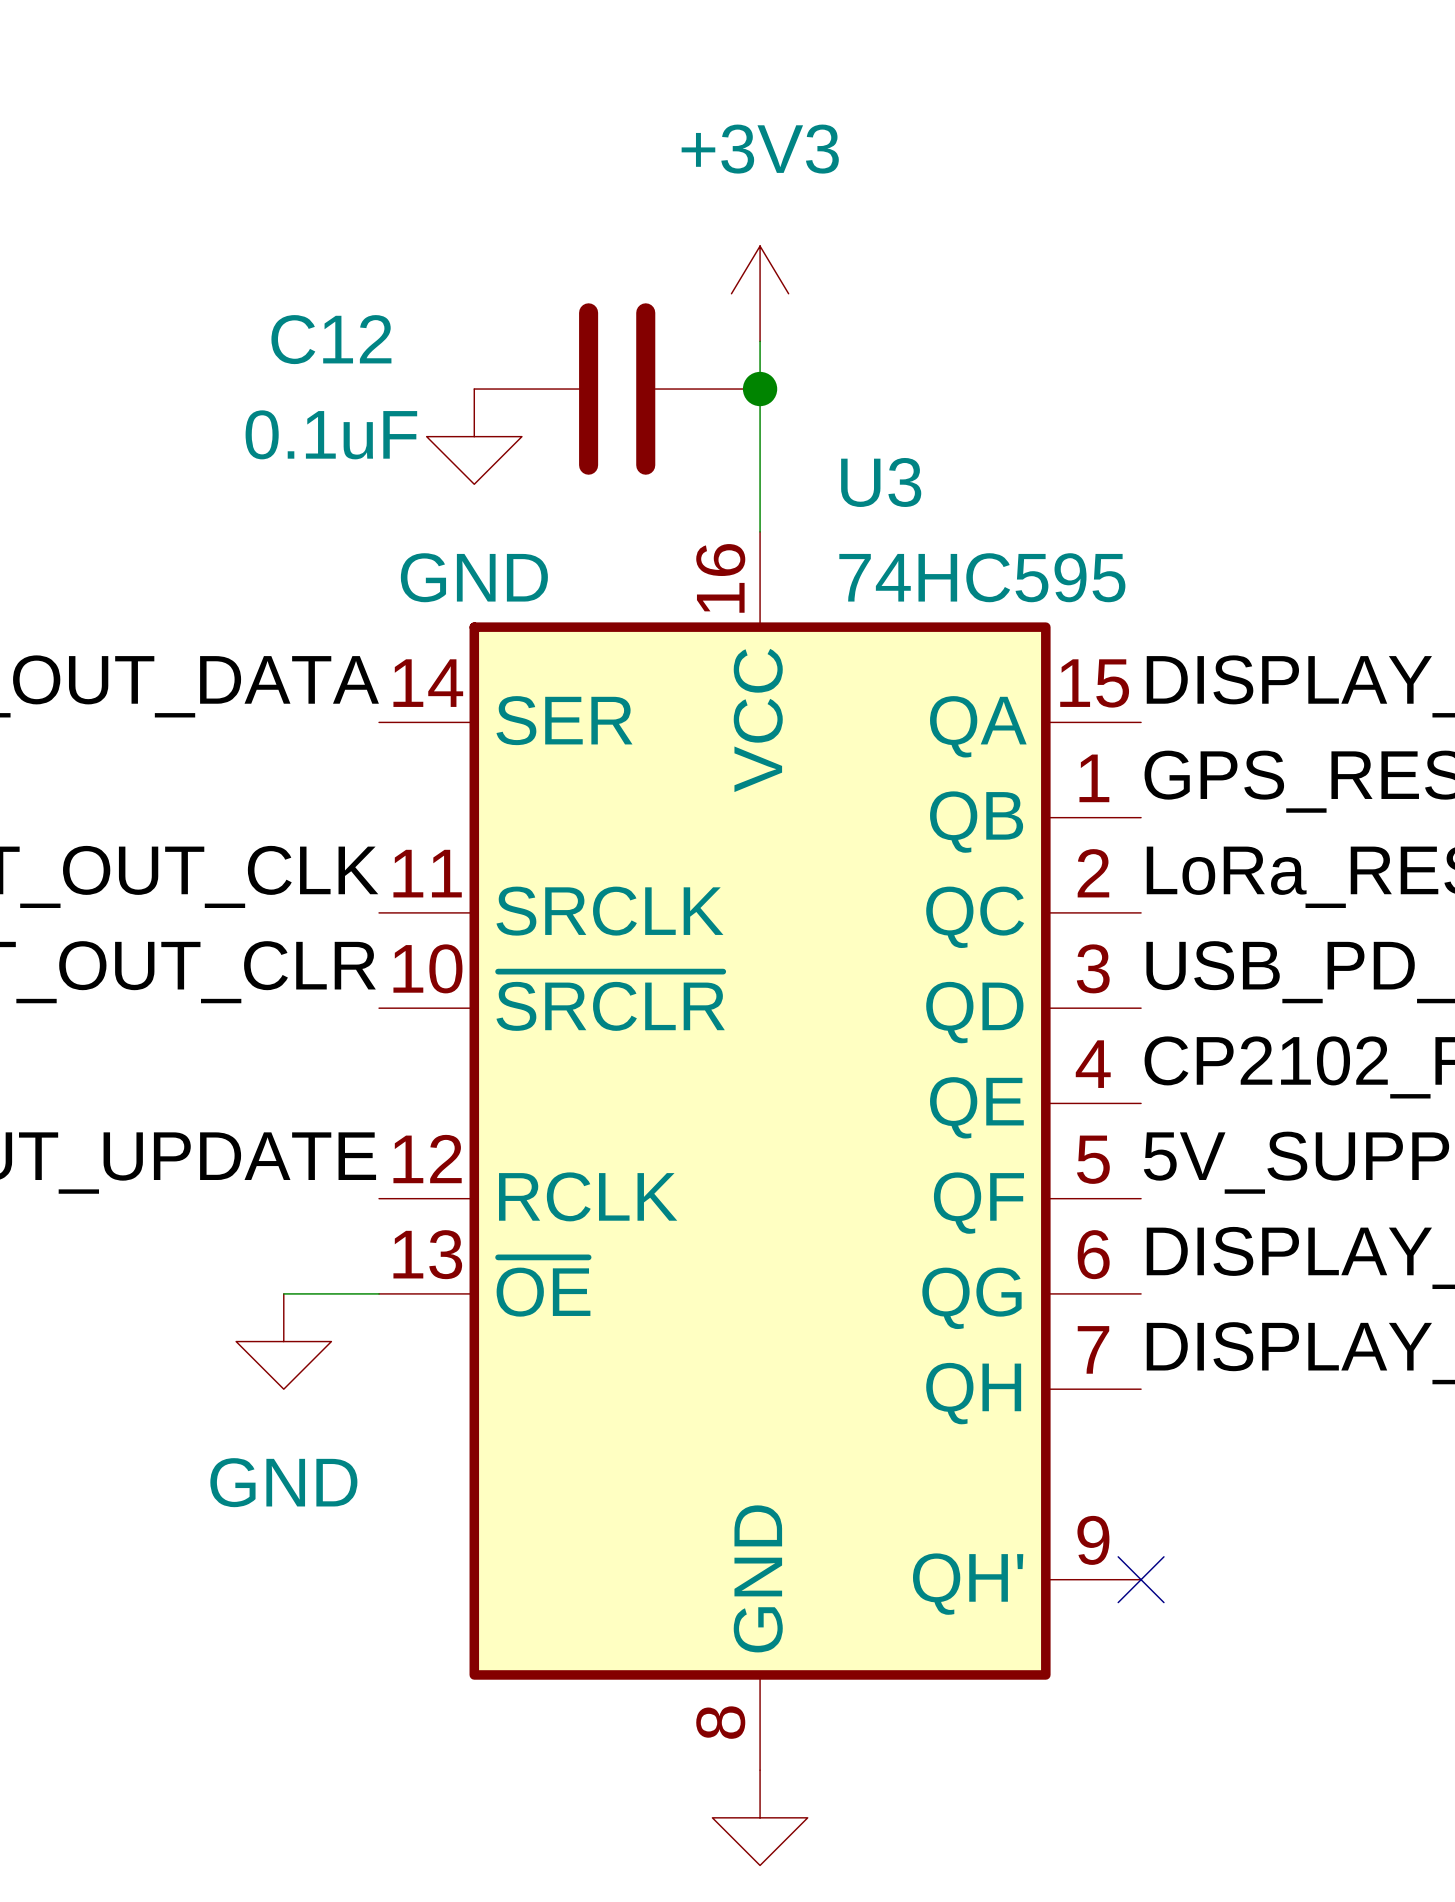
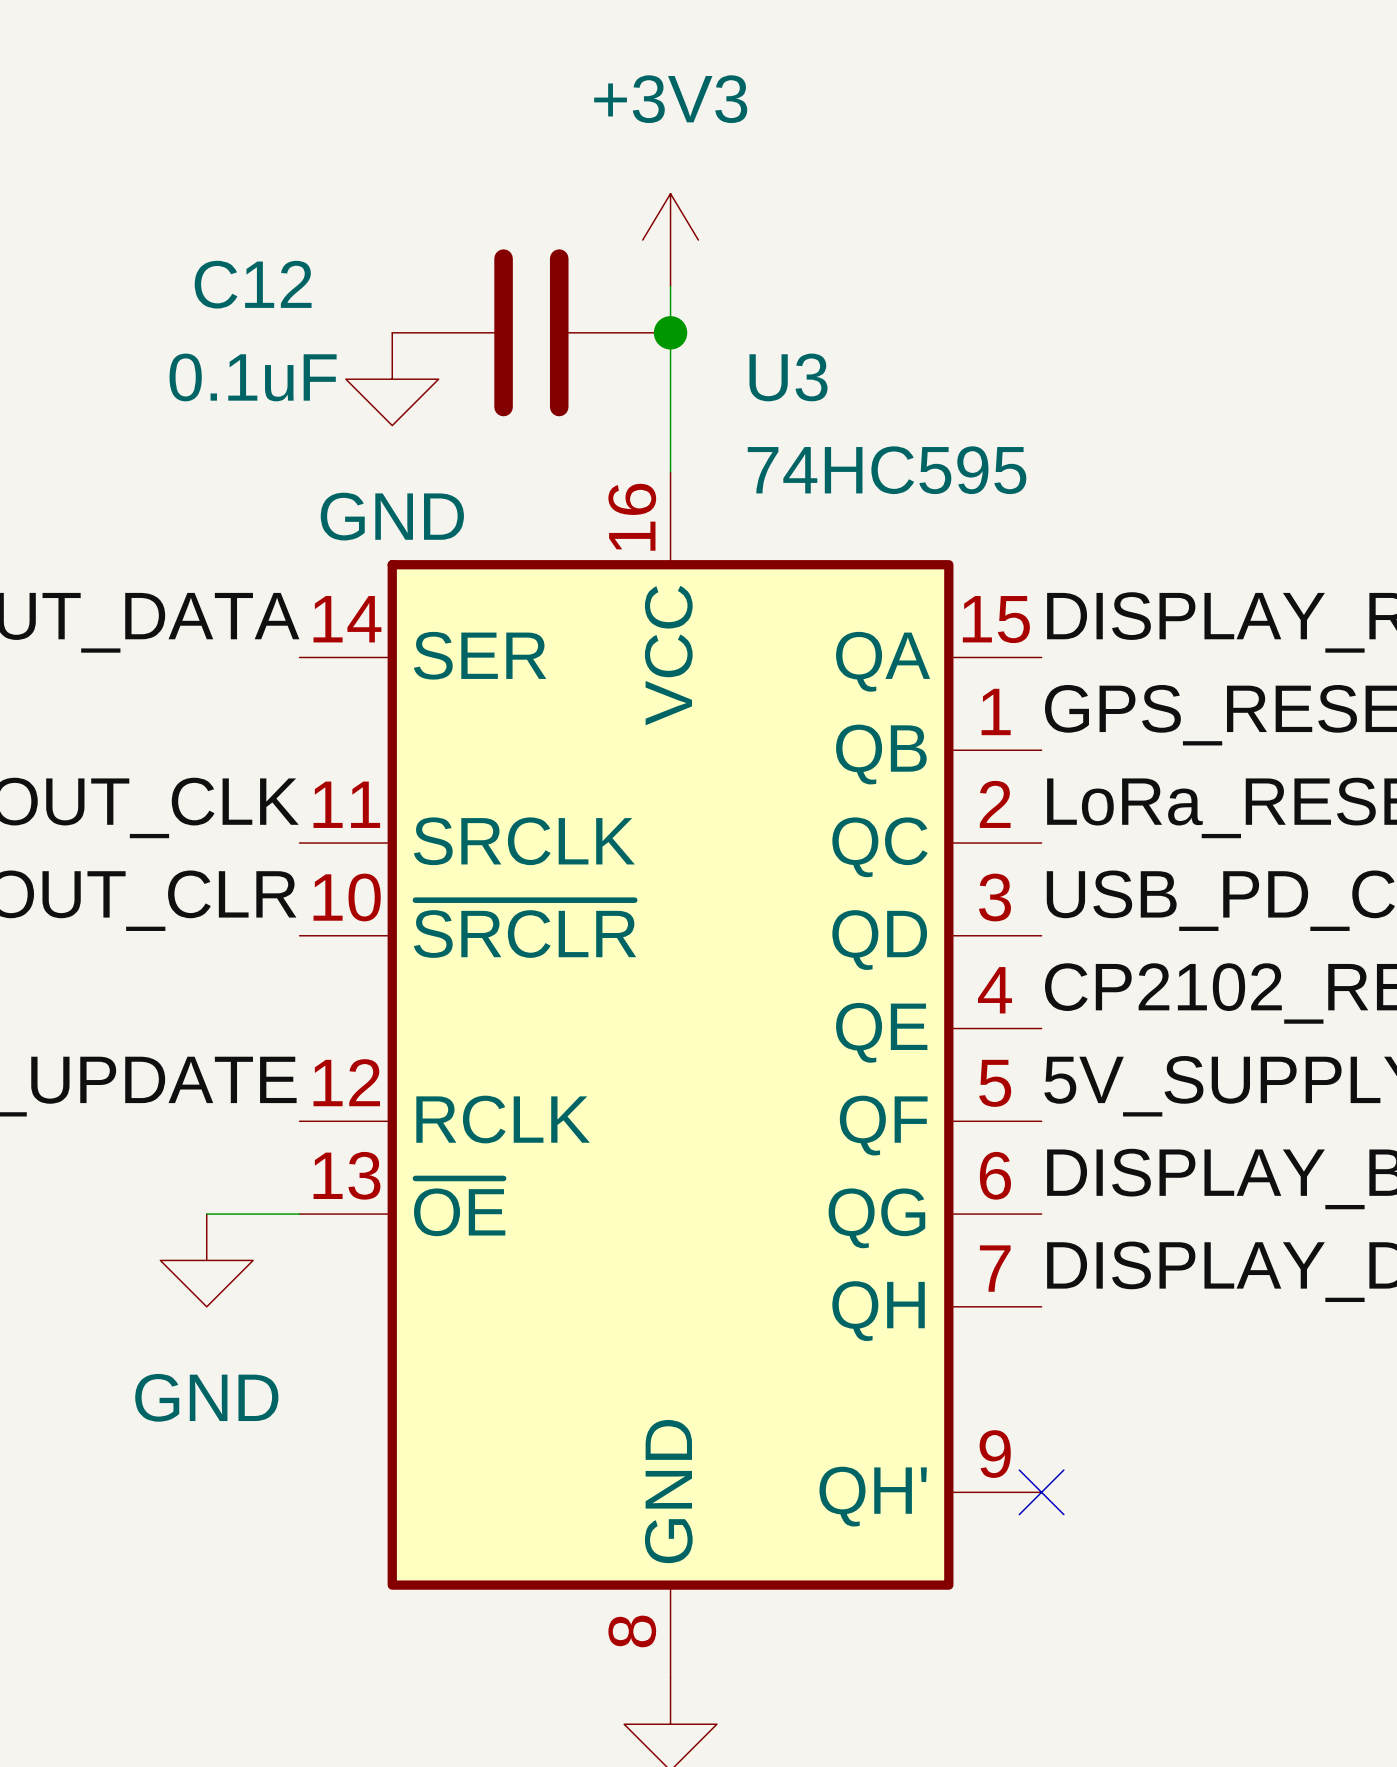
U3 name position: U3 (881, 482) -> U3 (788, 377)
U3 value position: 74HC595 (982, 577) -> 74HC595 (887, 470)

